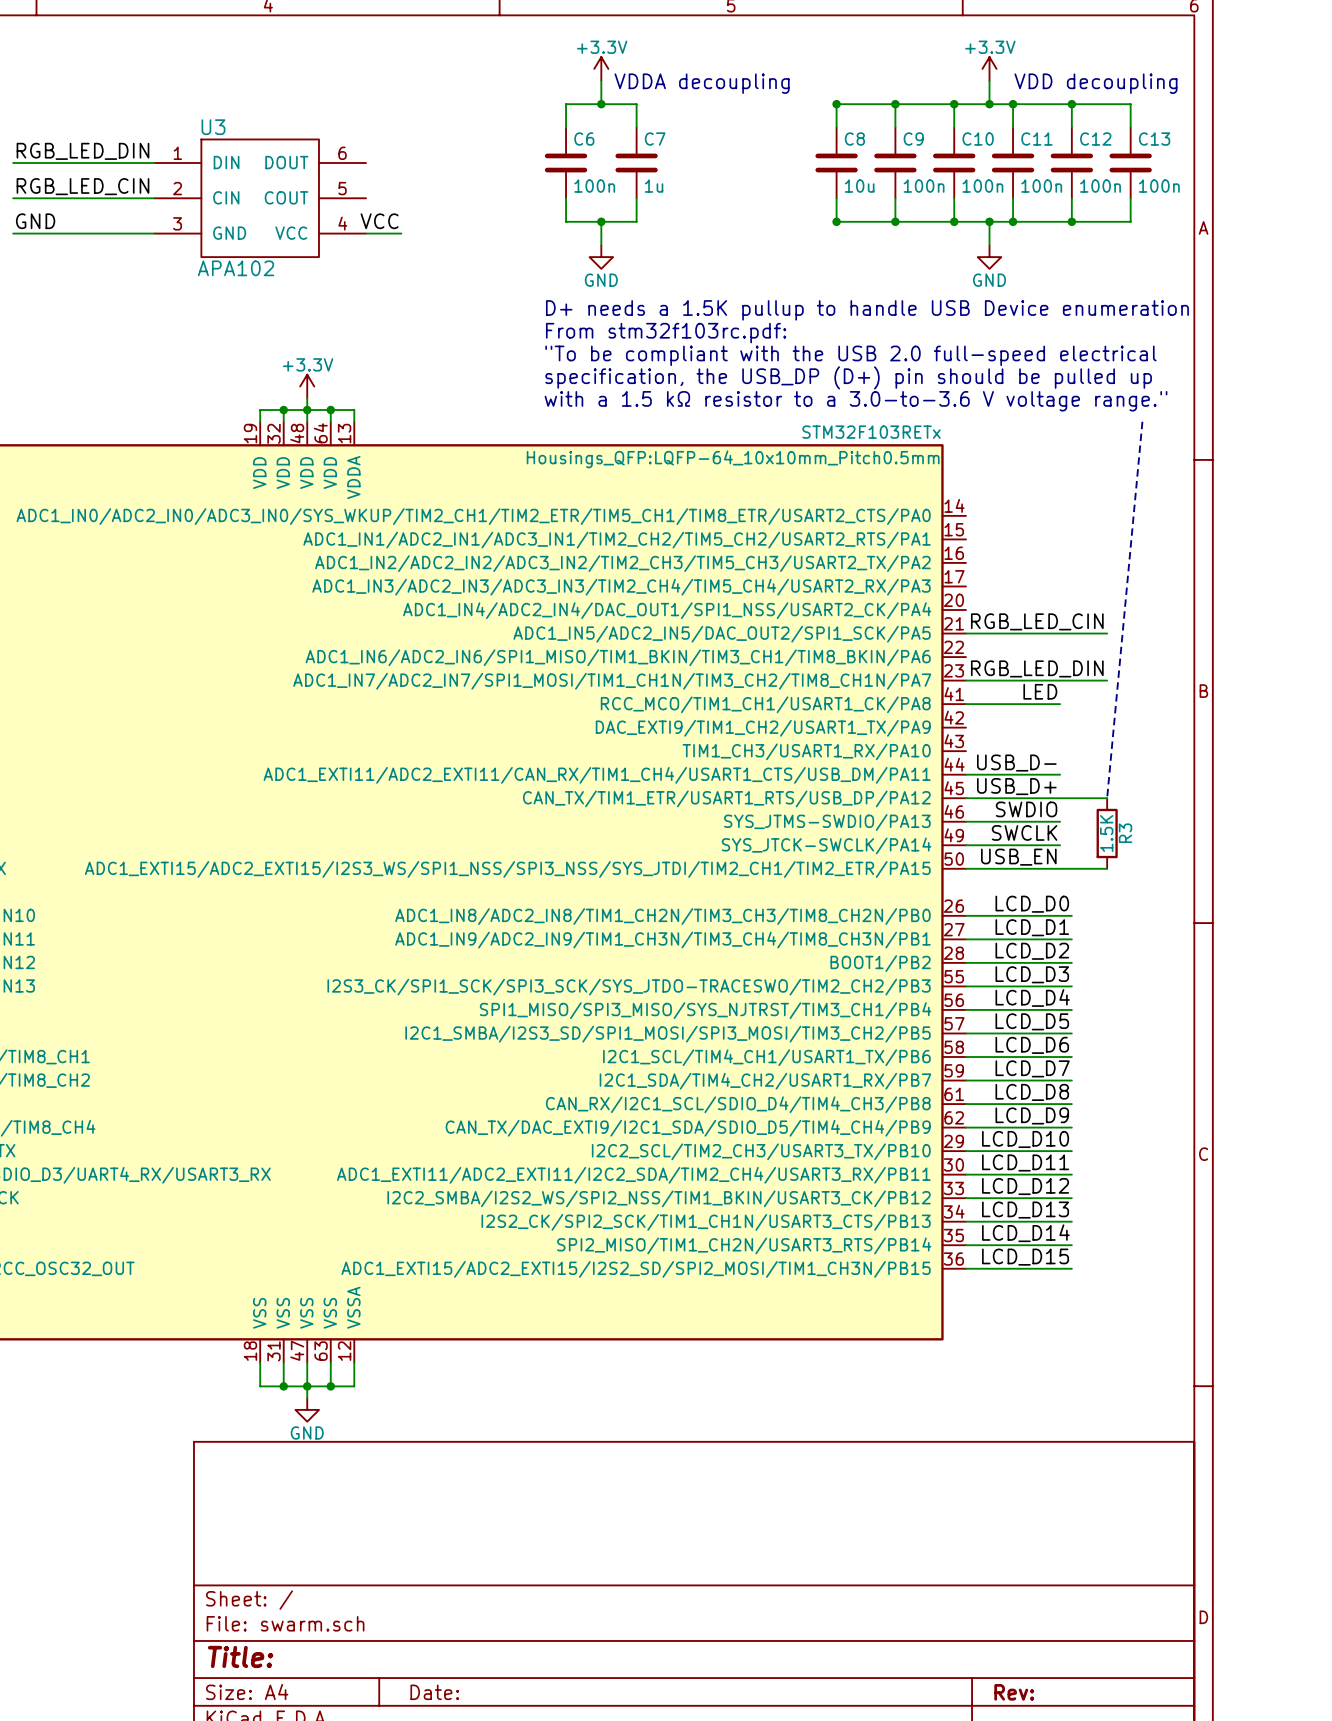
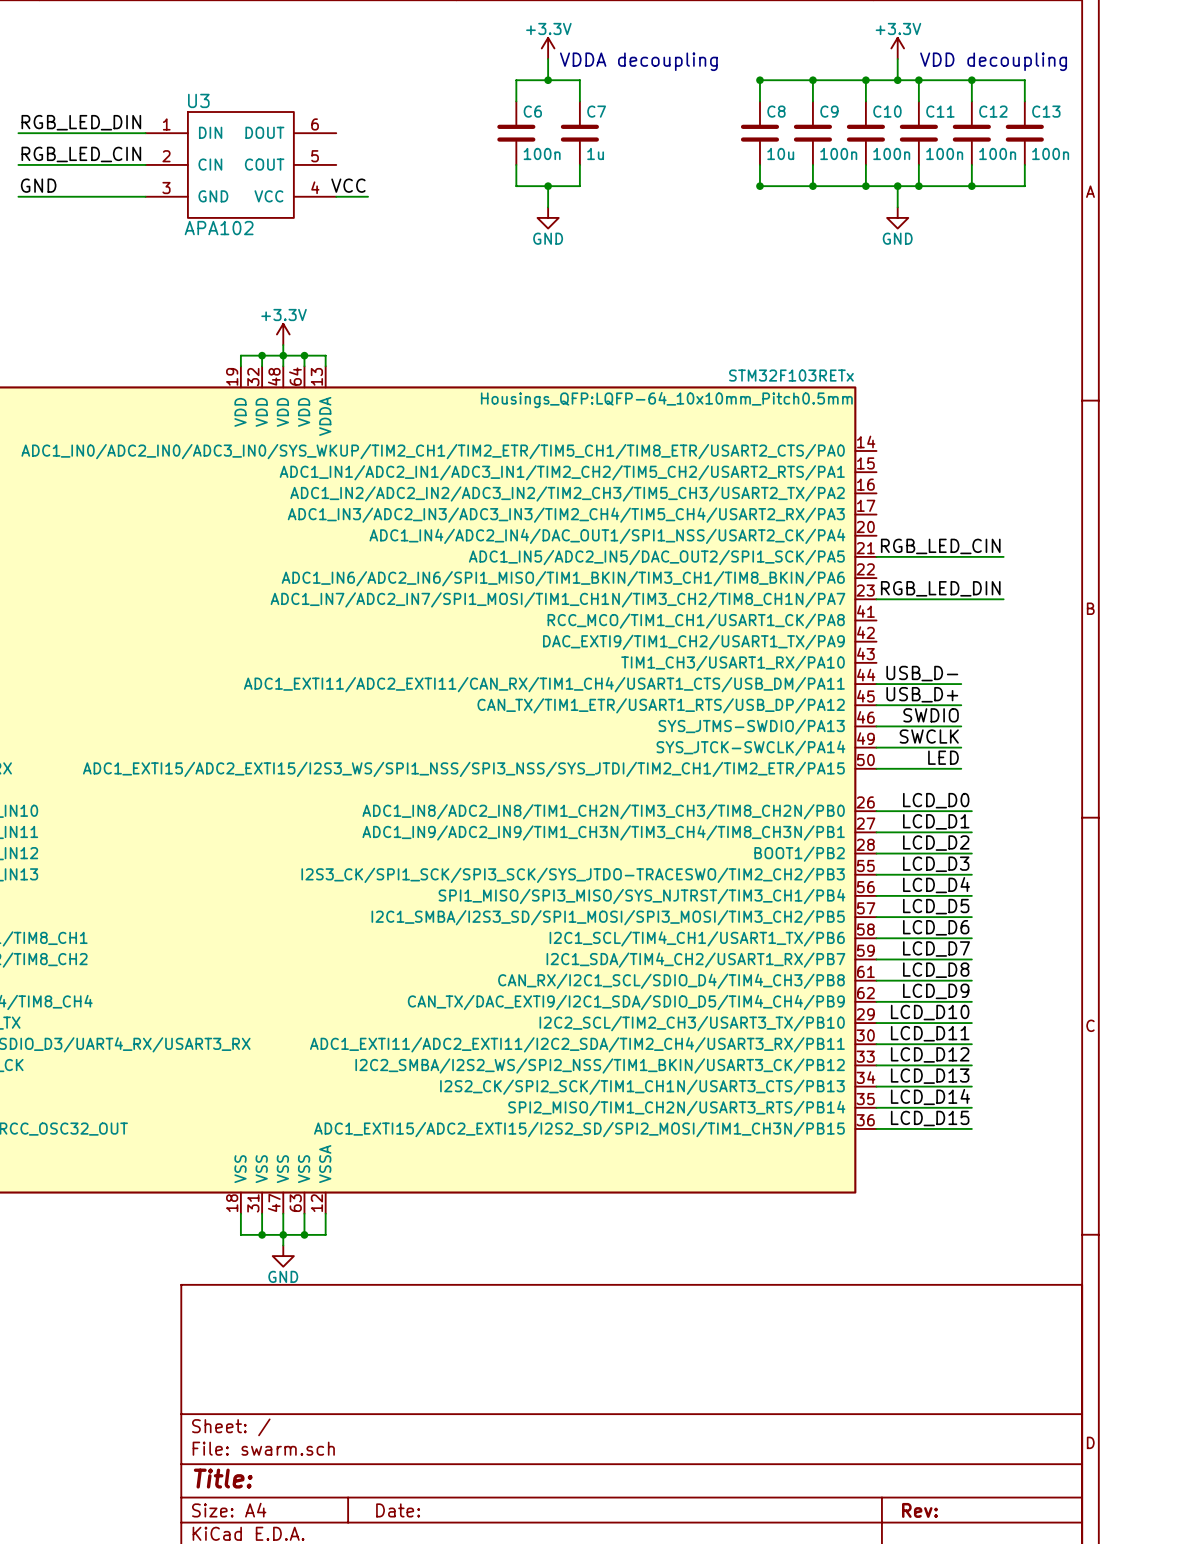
text: D+ needs a 1.5K pullup to handle USB Device enumeration (867, 310) -> none
text: From stm32f103rc.pdf: (666, 333) -> none
text: "To be compliant with the USB 2.0 full-speed electrical (850, 355) -> none
text: specification, the USB_DP (D+) pin should be pulled up (848, 377) -> none
text: with a 1.5 kΩ resistor to a 3.0-to-3.6 V voltage range." (856, 401) -> none
line: (1142, 421) (1107, 798) -> none
label: LED (1040, 691) -> none
wire: (965, 704) (1060, 704) -> none
wire: (1060, 798) (1107, 798) -> none
R3: 1.5K (1107, 833) -> none
label: USB_EN (1018, 857) -> LED (943, 757)
wire: (1060, 868) (1107, 868) -> none

